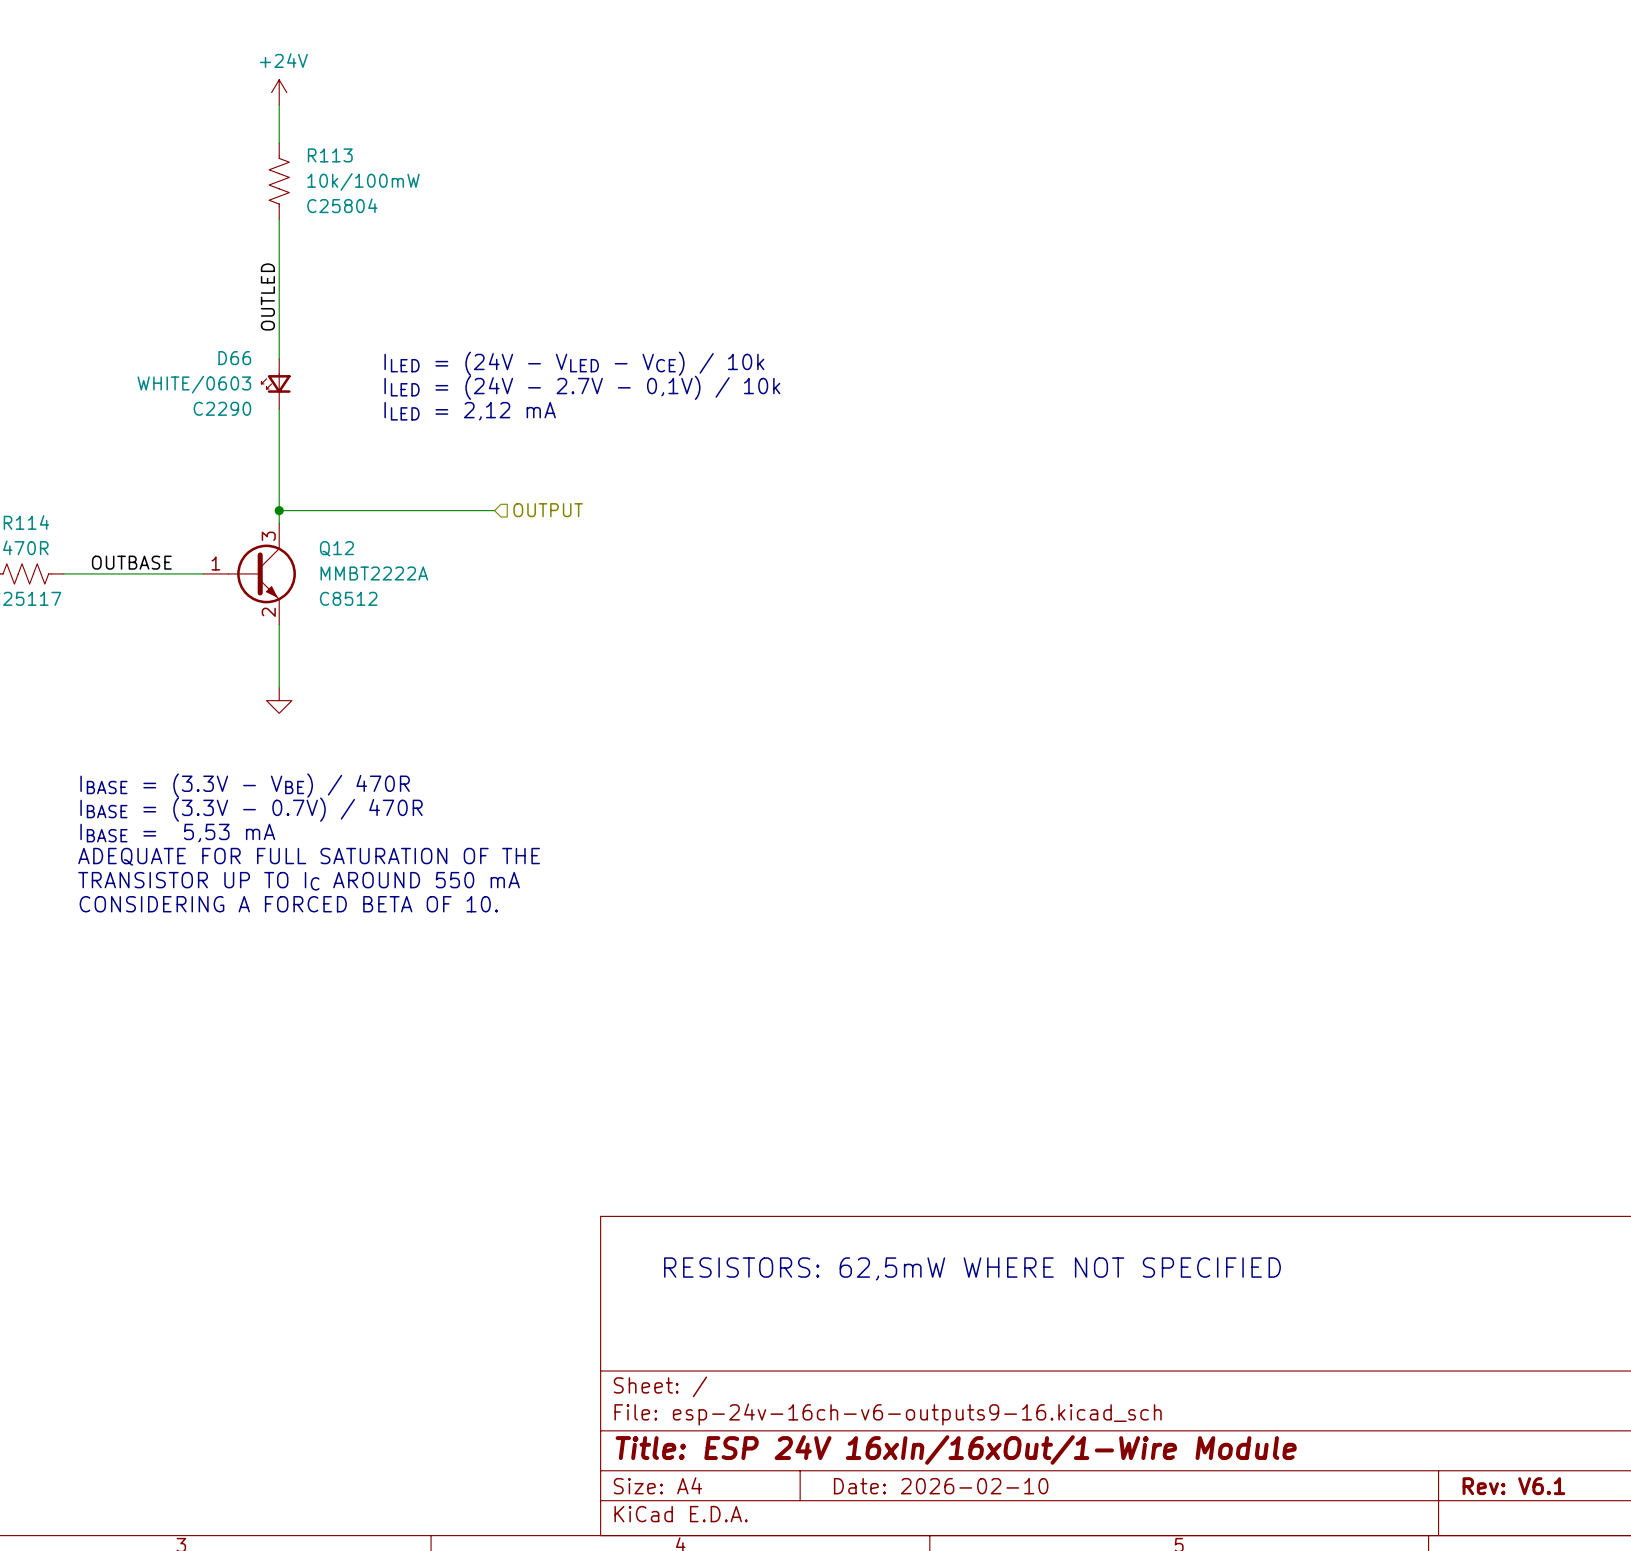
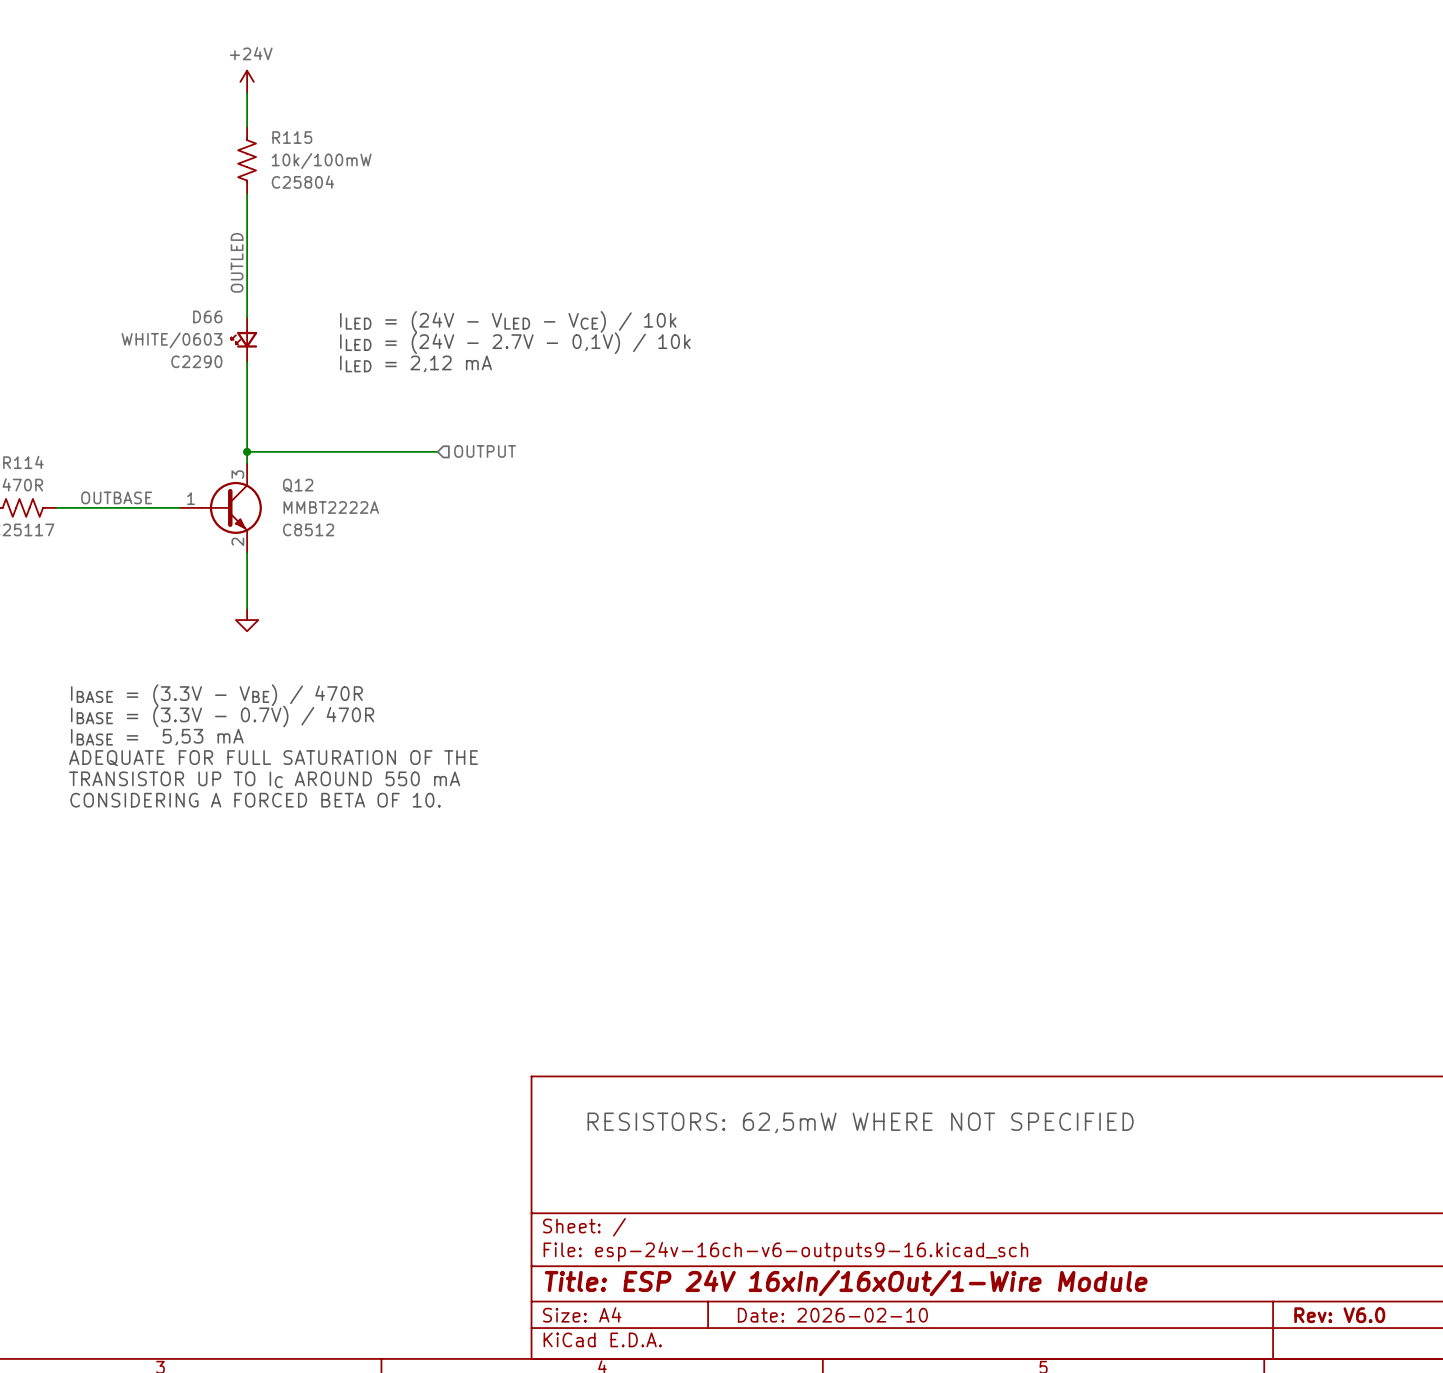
R113 name: R113 (330, 155) -> R115 (292, 137)
title block: Rev: V6.1 (1513, 1486) -> Rev: V6.0 (1339, 1315)

